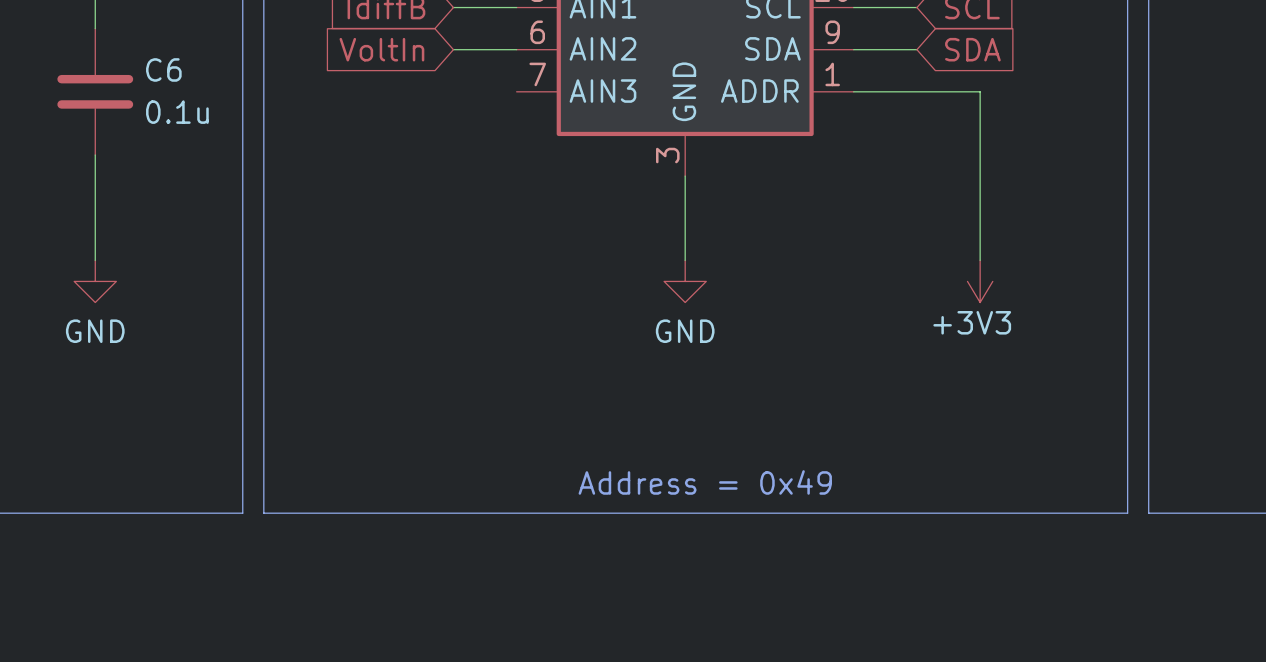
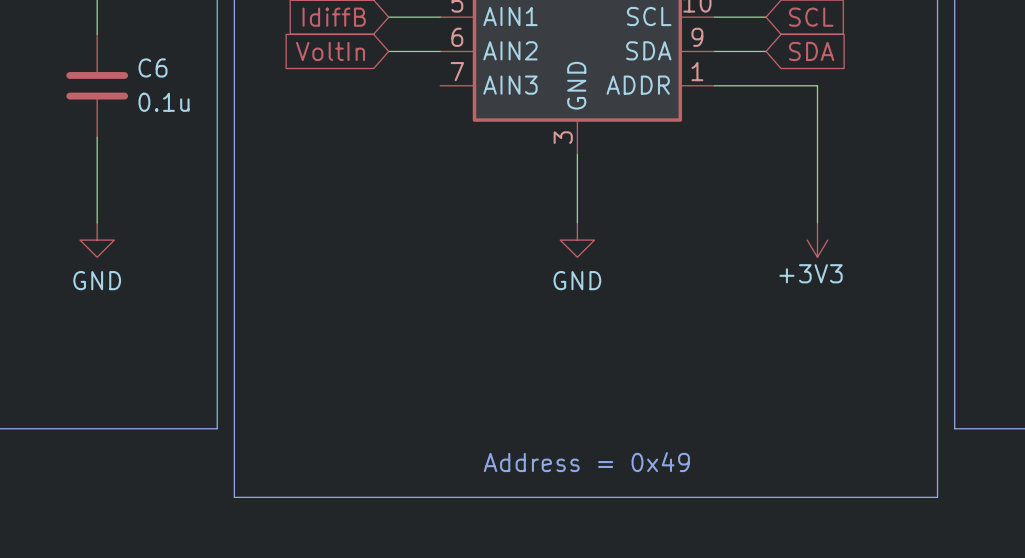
text position: Address = 0x49 (705, 482) -> Address = 0x49 (586, 462)
line: (263, 513) (1127, 513) -> (234, 428) (234, 497) (937, 497) (937, 428)

